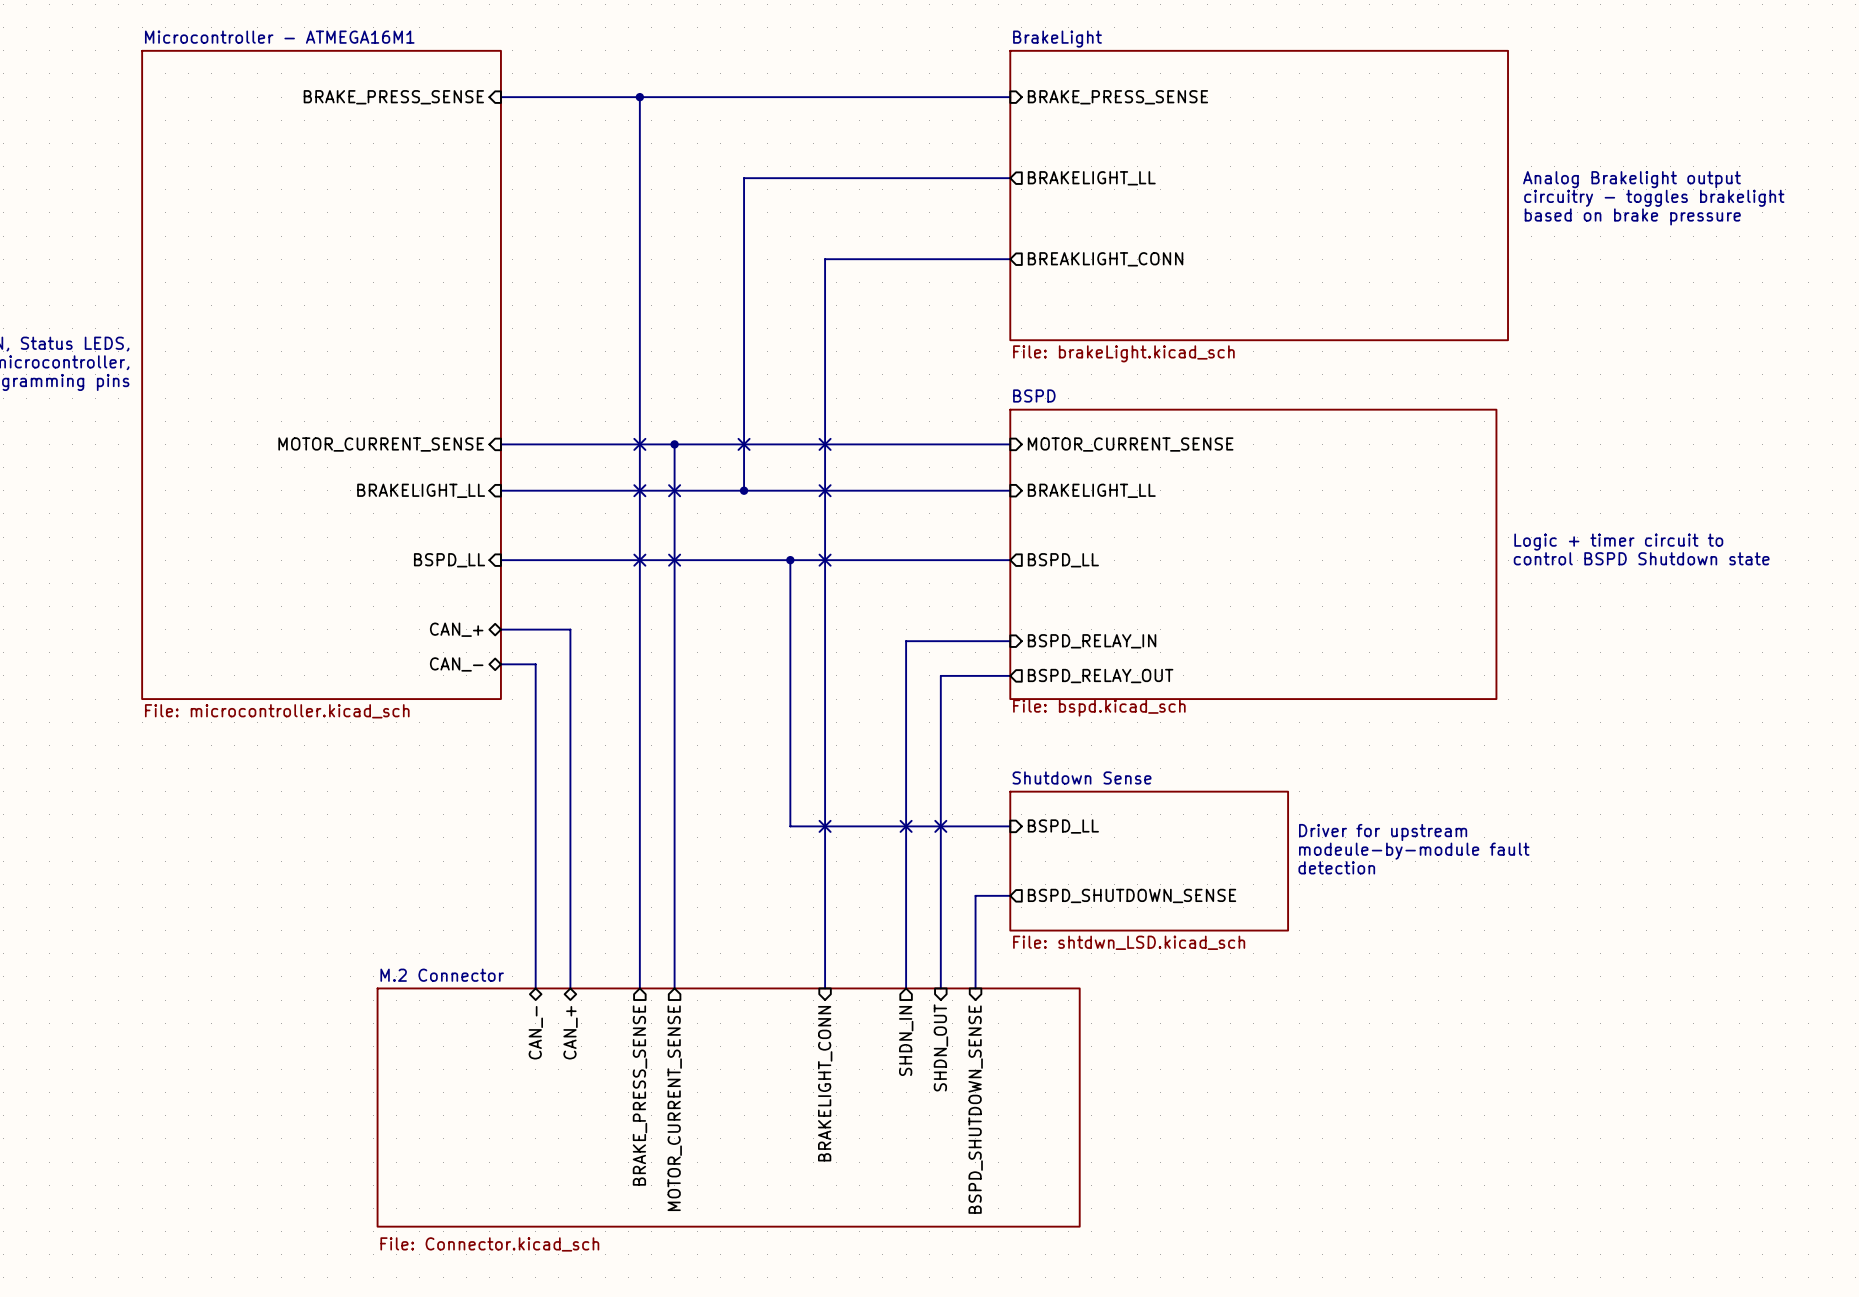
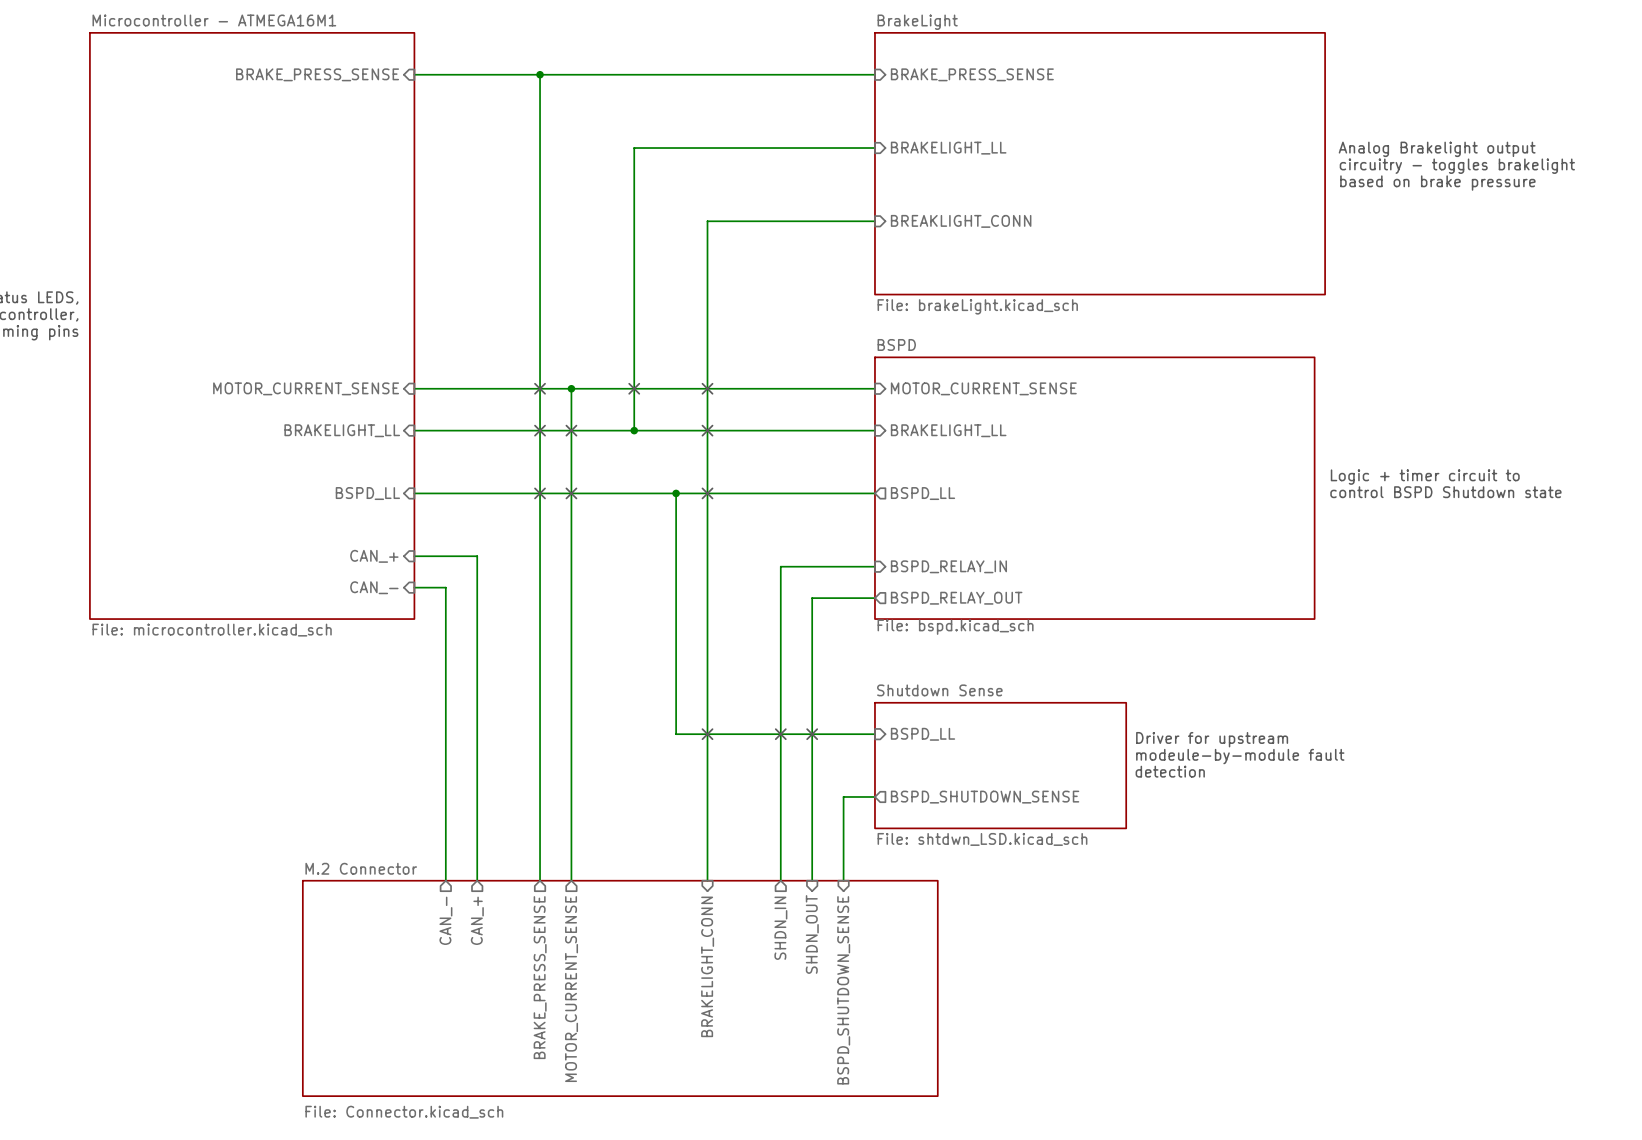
sheet pin shape: output (1091, 178) -> input (948, 148)
sheet pin shape: output (1105, 259) -> input (961, 221)
sheet pin shape: bidirectional (456, 629) -> input (374, 556)
sheet pin shape: bidirectional (456, 664) -> input (374, 587)
sheet pin shape: bidirectional (535, 1032) -> output (445, 920)
sheet pin shape: bidirectional (570, 1032) -> output (477, 920)

